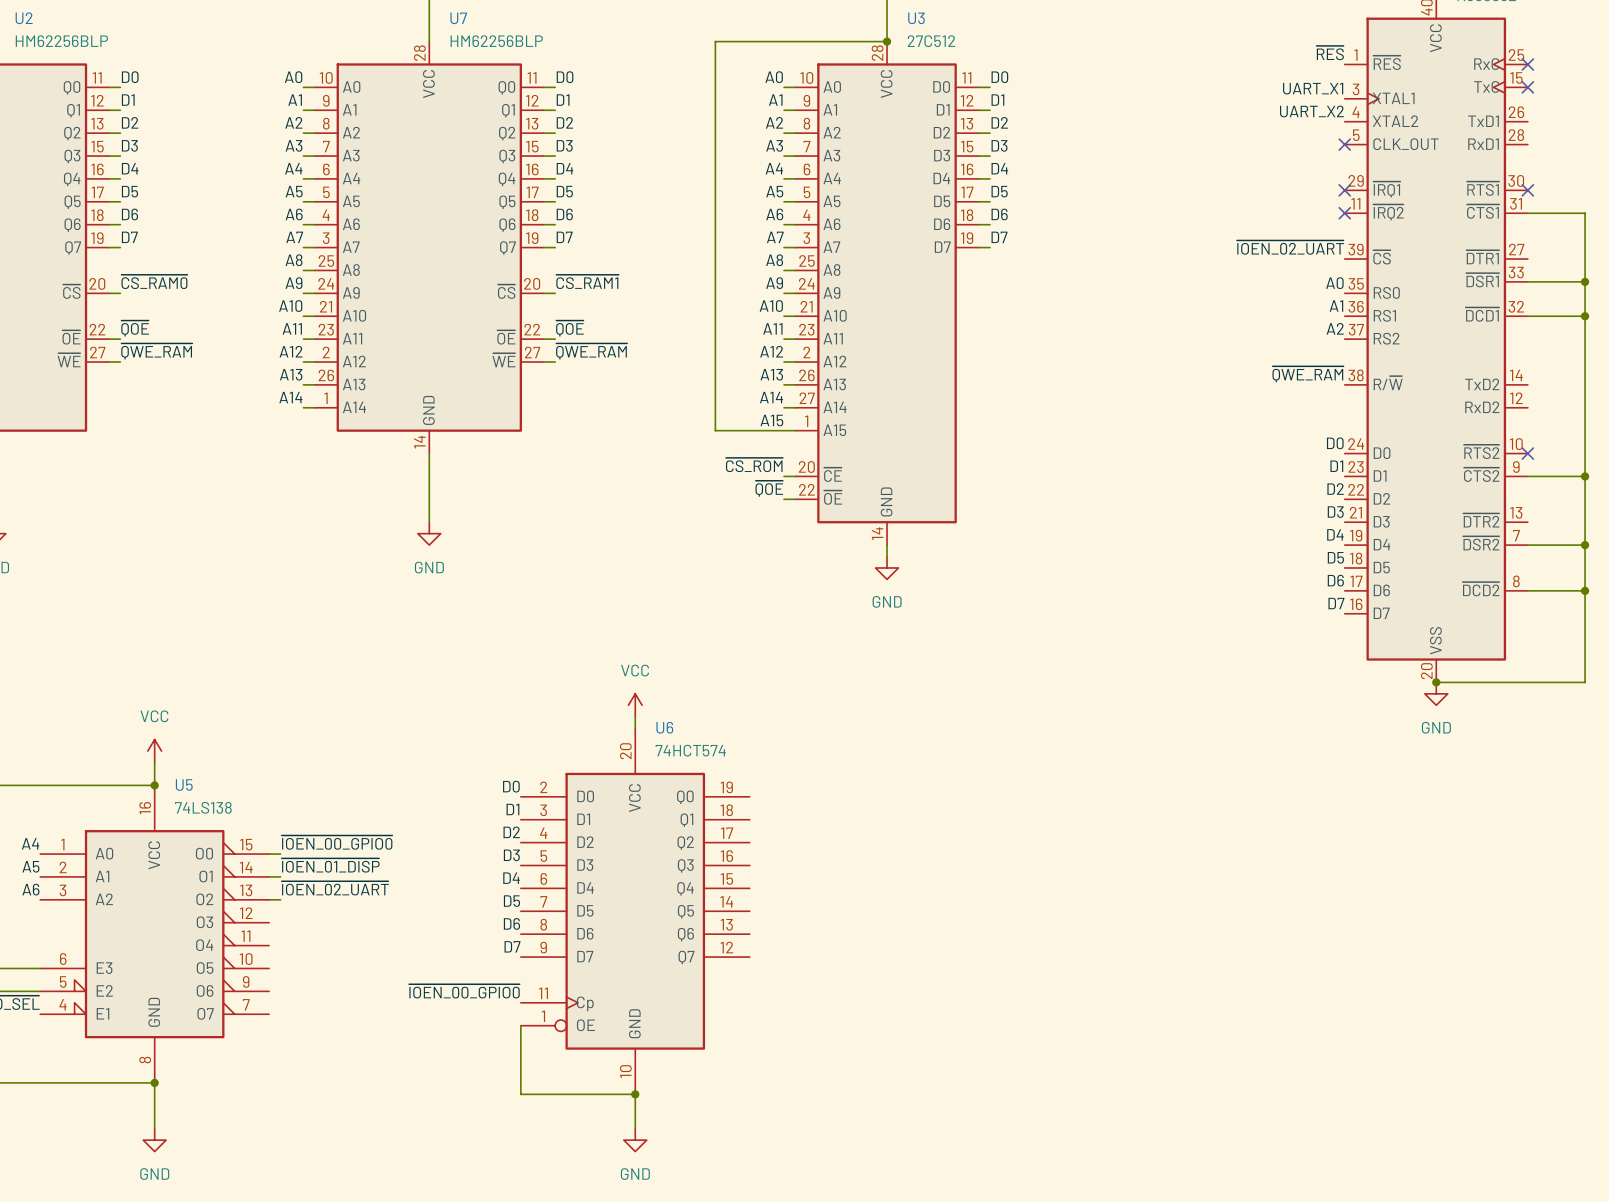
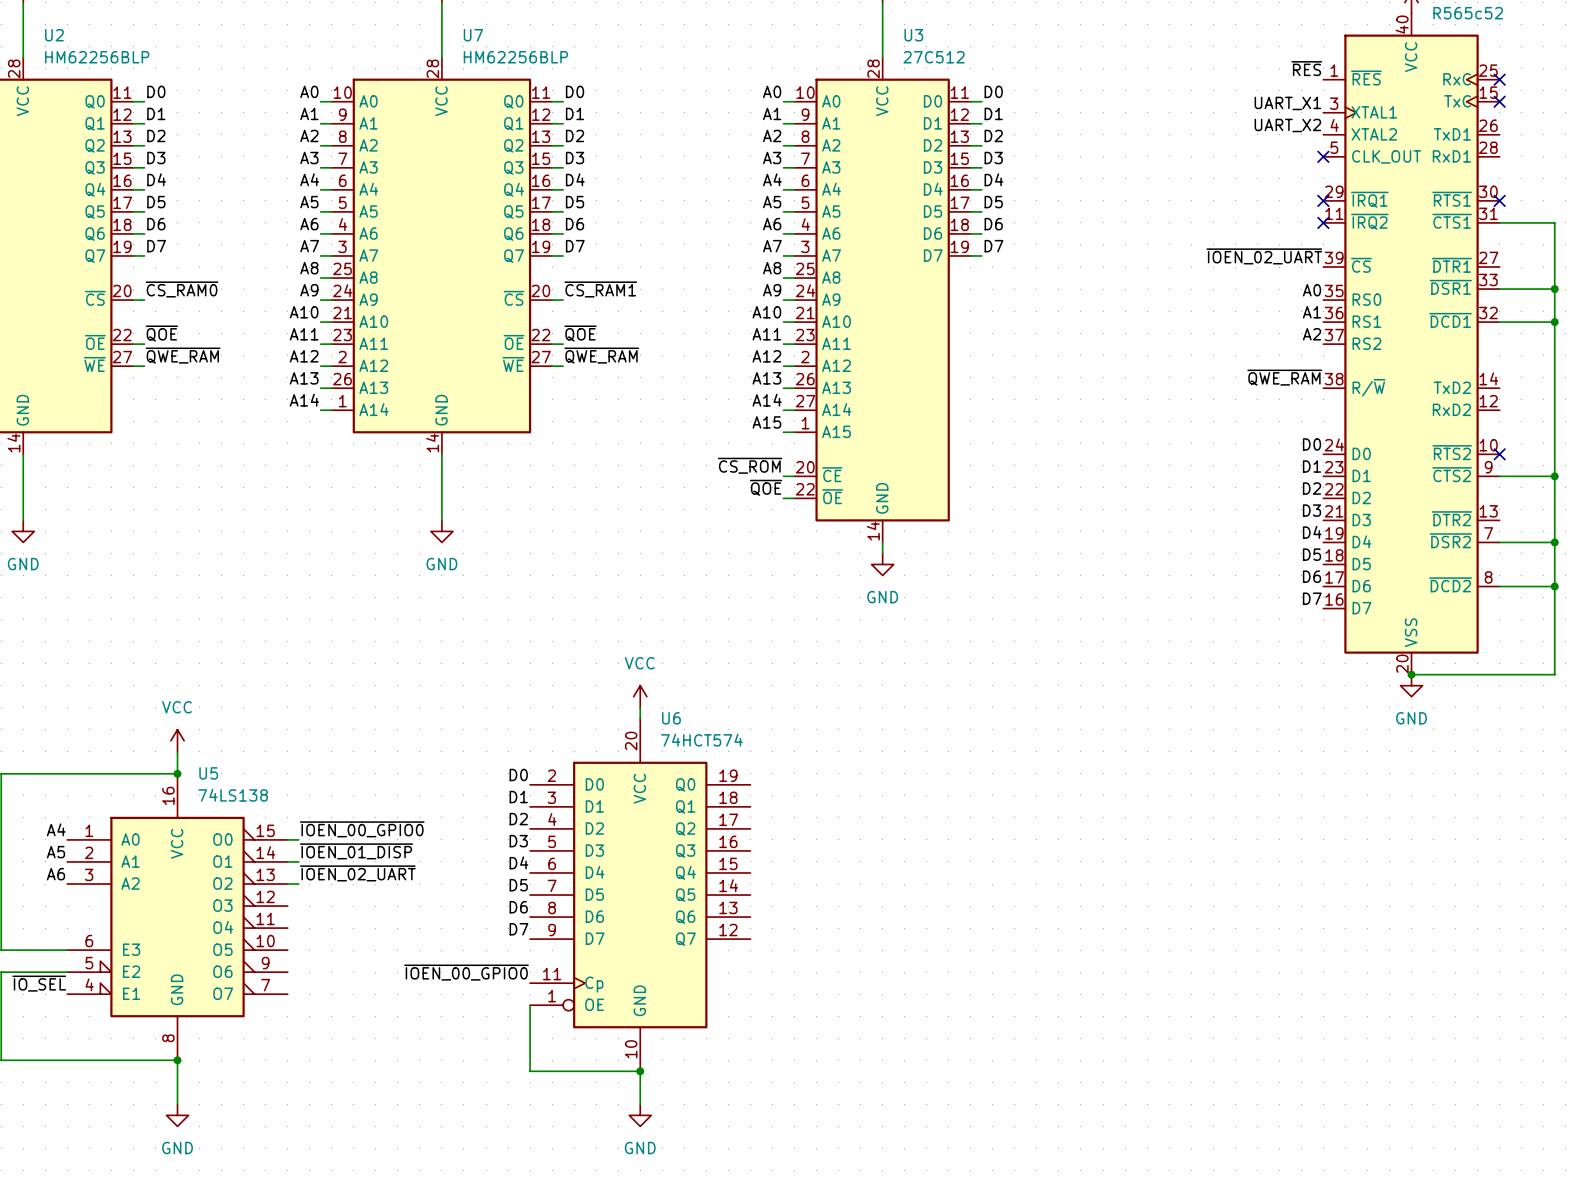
wire: (887, 41) (715, 41) (715, 430) (784, 430) -> none
junction: (887, 41) -> none

